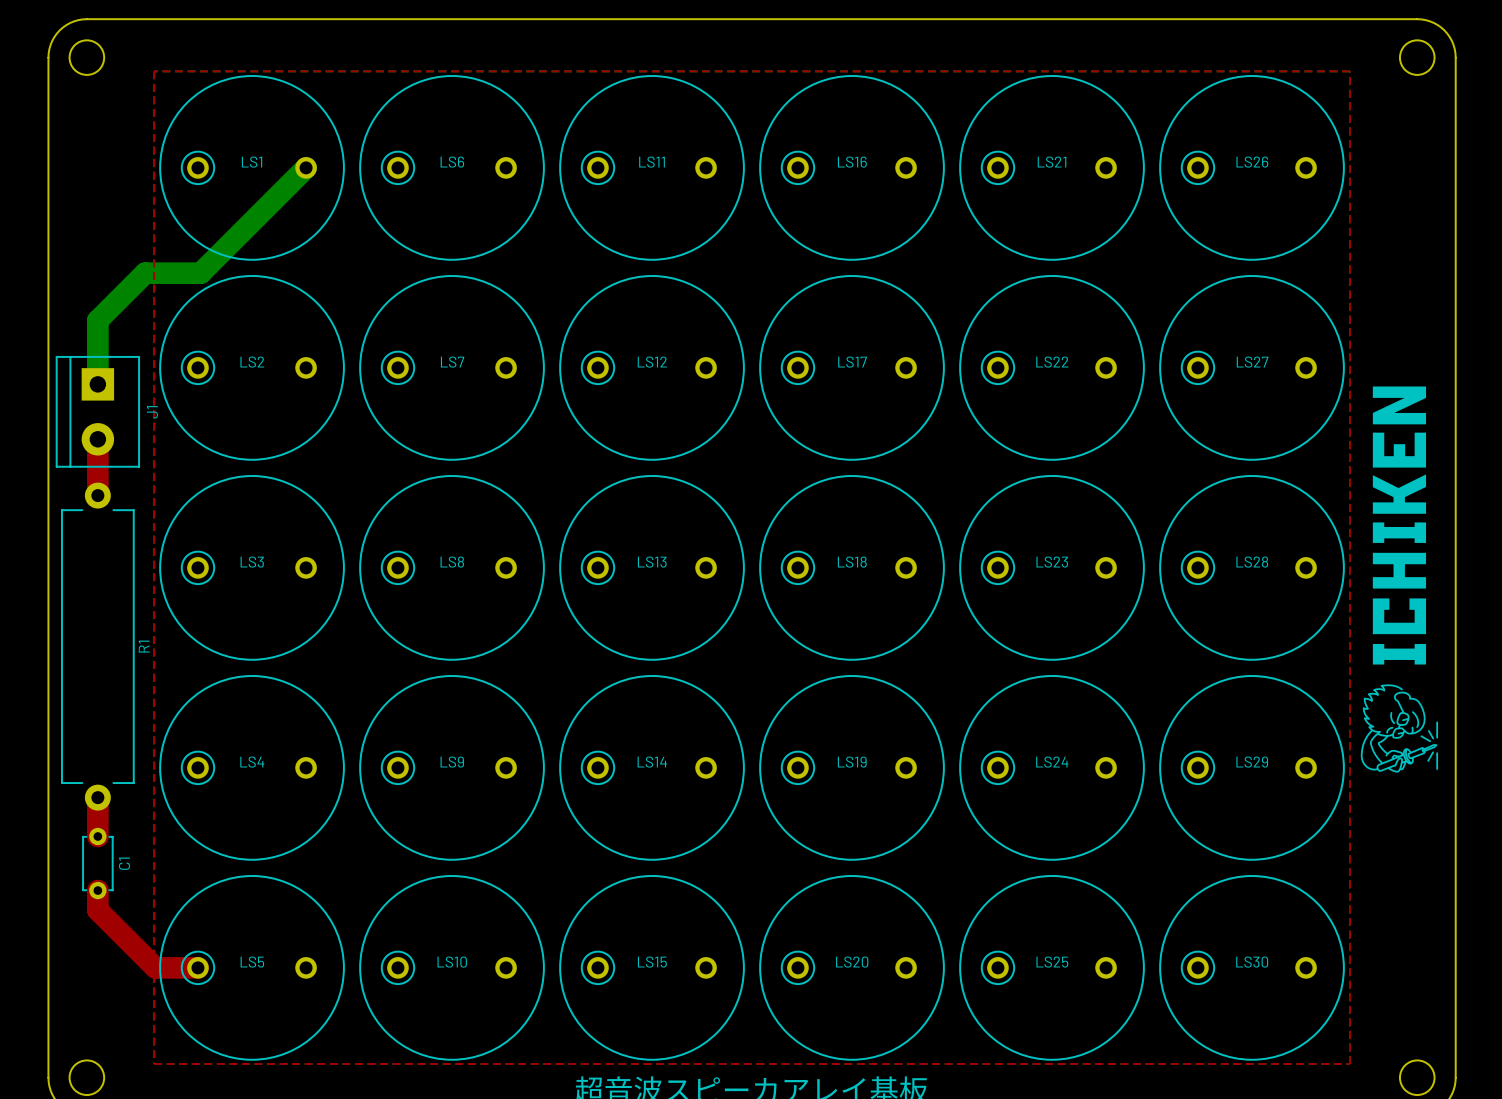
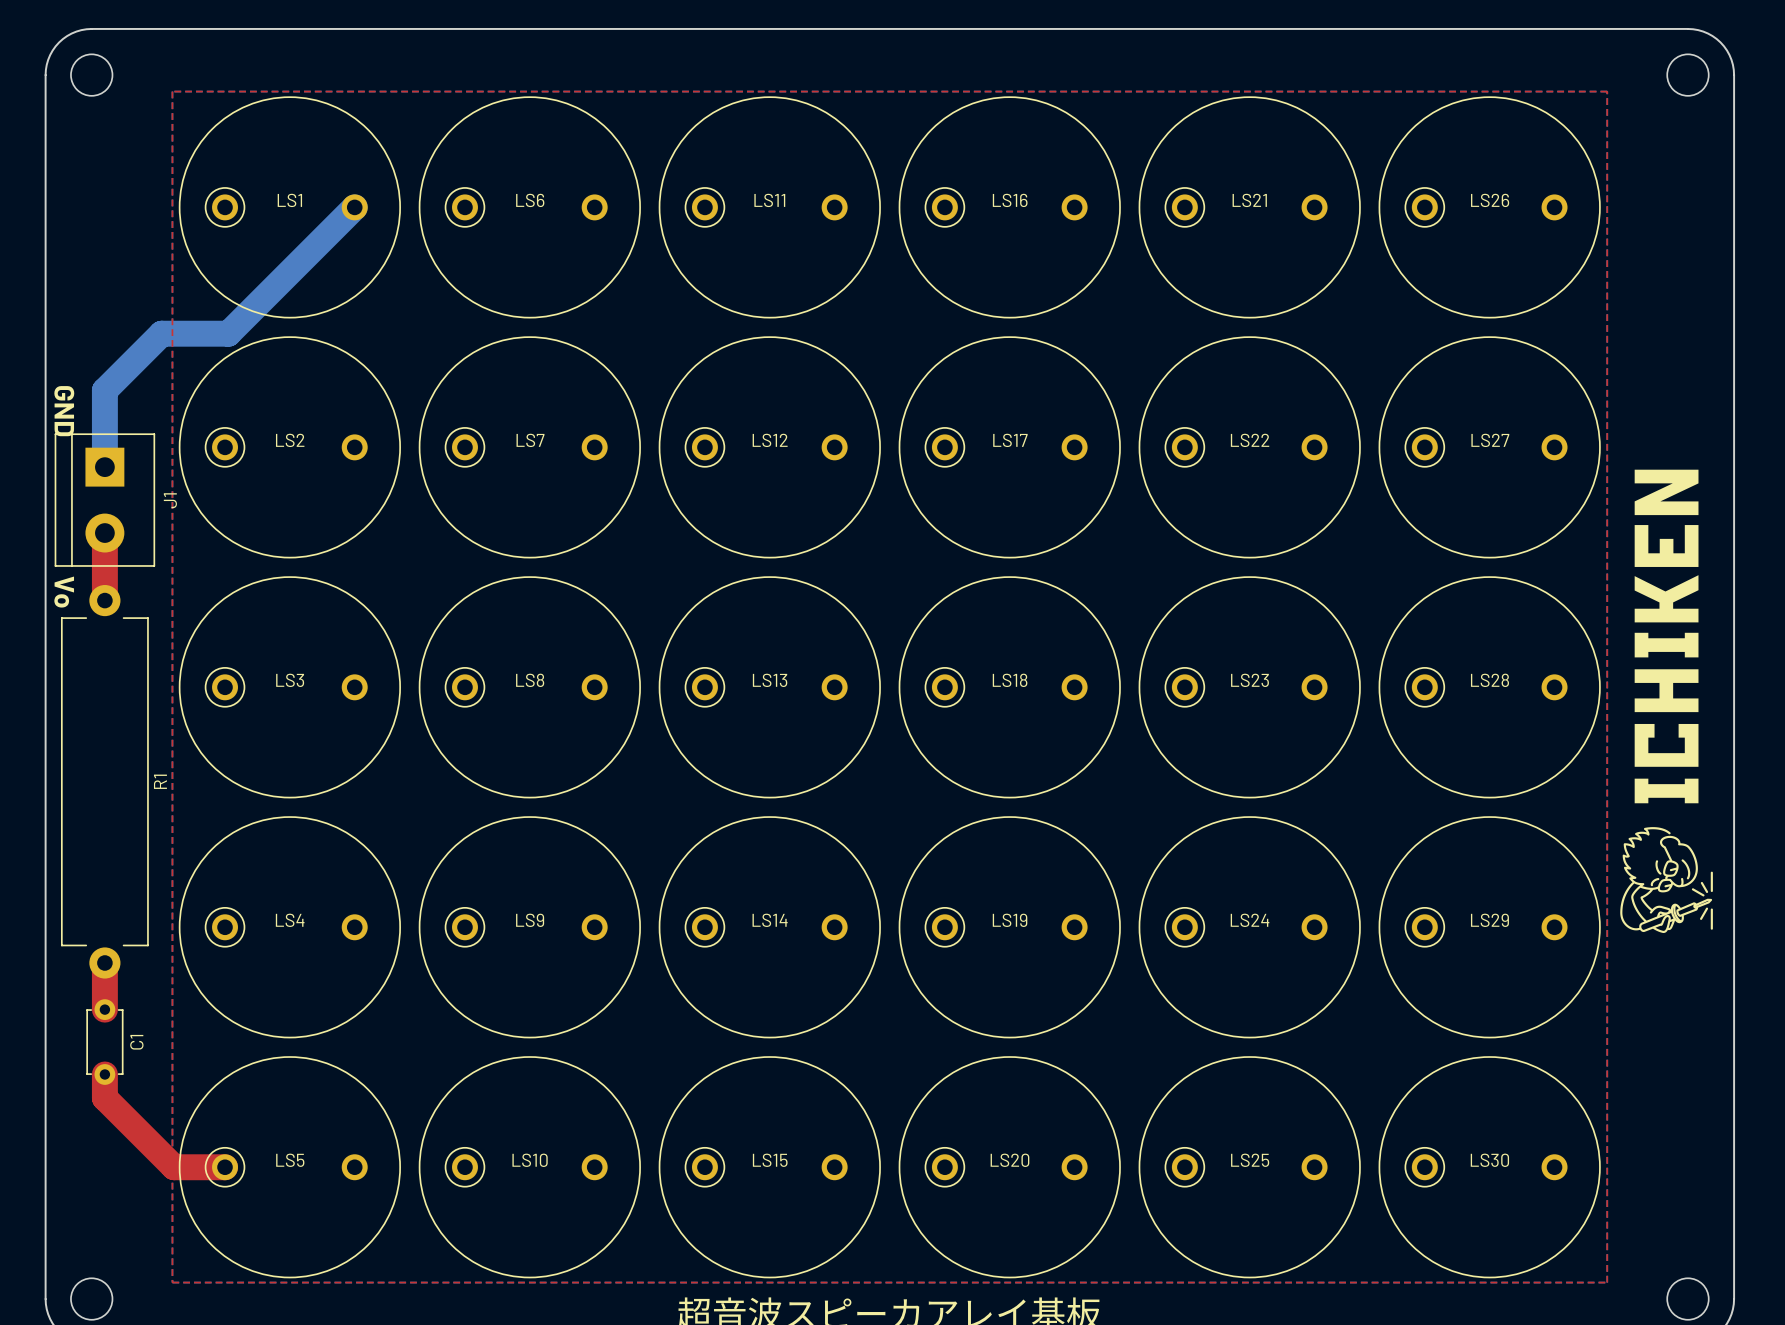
text: none -> GND (64, 411)
text: none -> Vo (64, 592)

